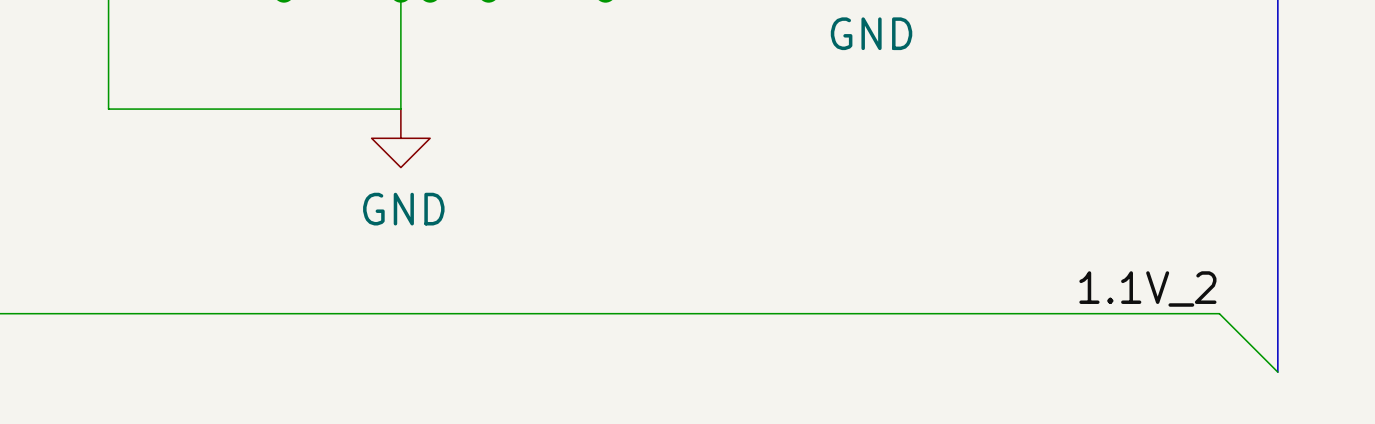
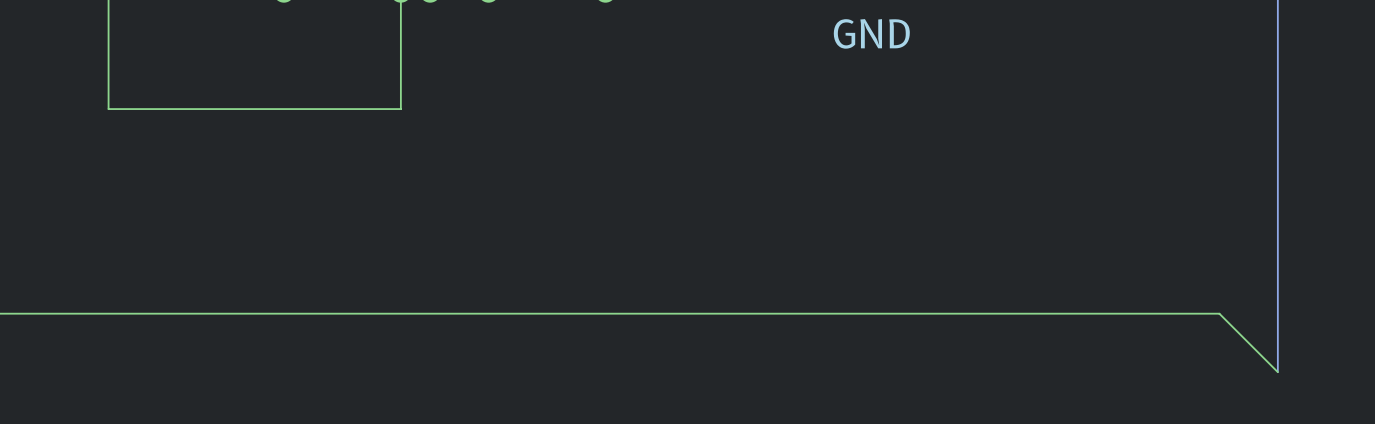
power symbol: GND (400, 138) -> none
label: 1.1V_2 (1147, 288) -> none

